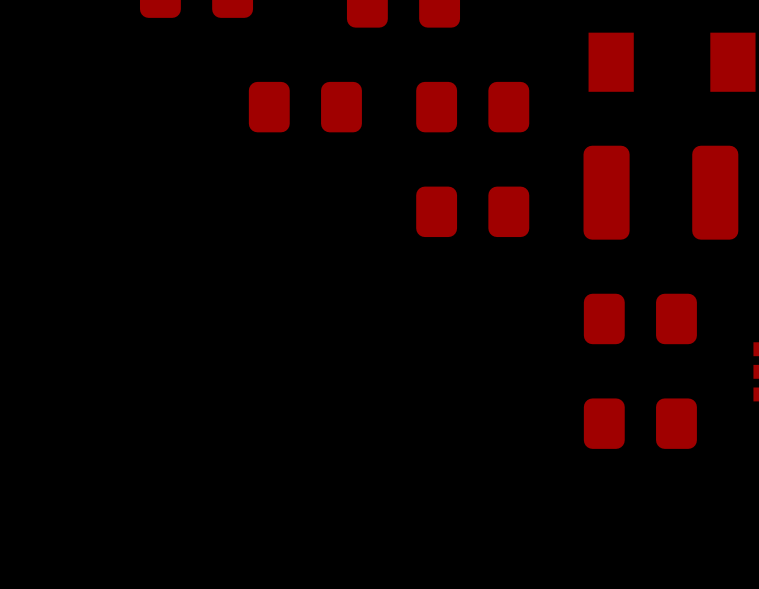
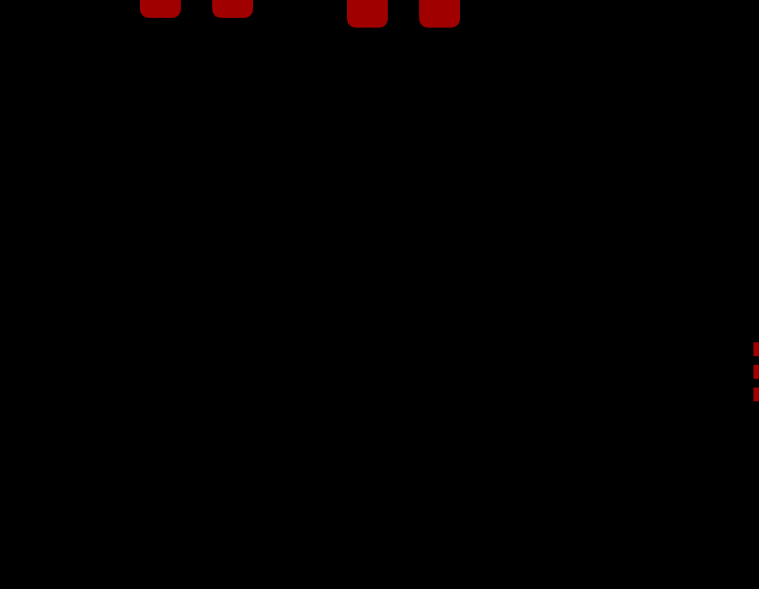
part: (672, 62) -> none
part: (305, 107) -> none
part: (472, 107) -> none
part: (660, 192) -> none
part: (472, 211) -> none
part: (640, 318) -> none
part: (640, 423) -> none

